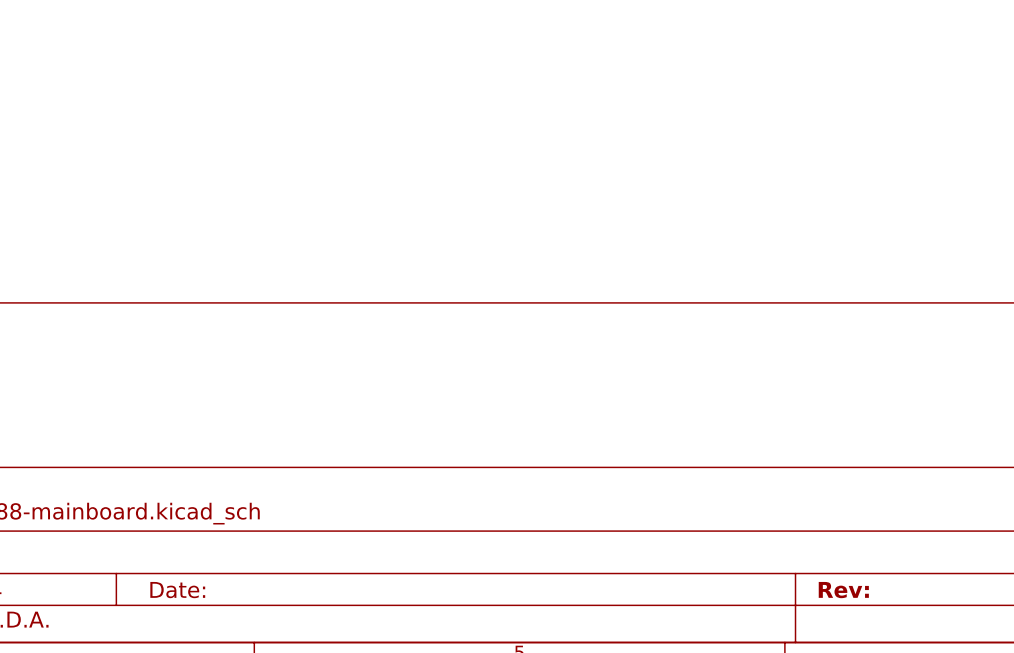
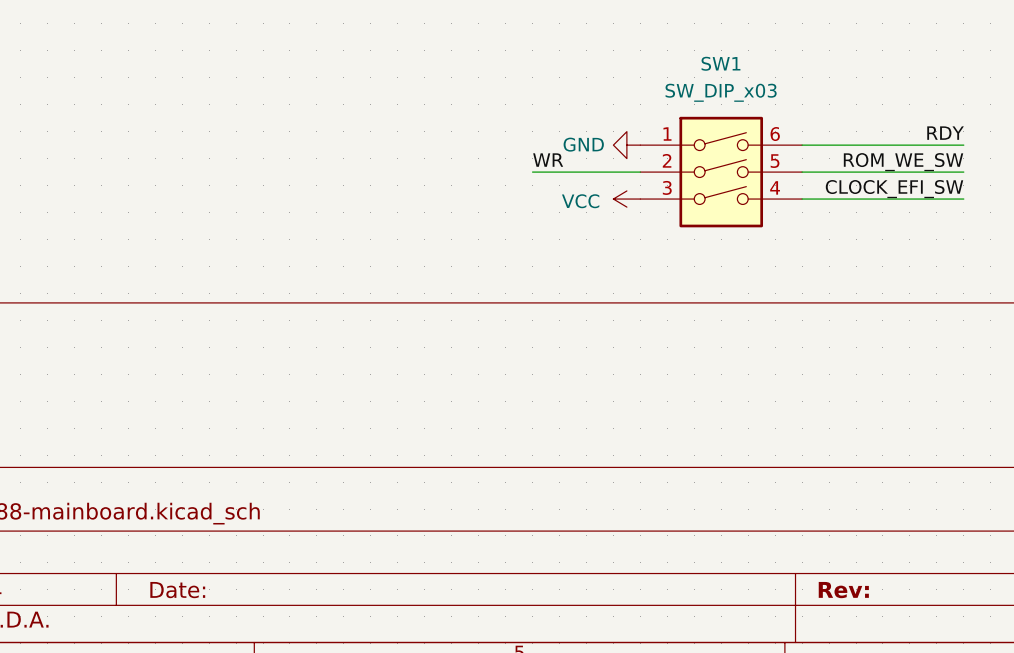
label: none -> RDY (945, 133)
power symbol: none -> GND (626, 145)
wire: none -> (802, 145) (963, 145)
label: none -> WR (548, 160)
label: none -> ROM_WE_SW (903, 162)
wire: none -> (532, 172) (640, 172)
SW1: none -> SW_DIP_x03 (721, 172)
wire: none -> (802, 172) (963, 172)
label: none -> CLOCK_EFI_SW (894, 189)
power symbol: none -> VCC (626, 199)
wire: none -> (802, 199) (963, 199)

